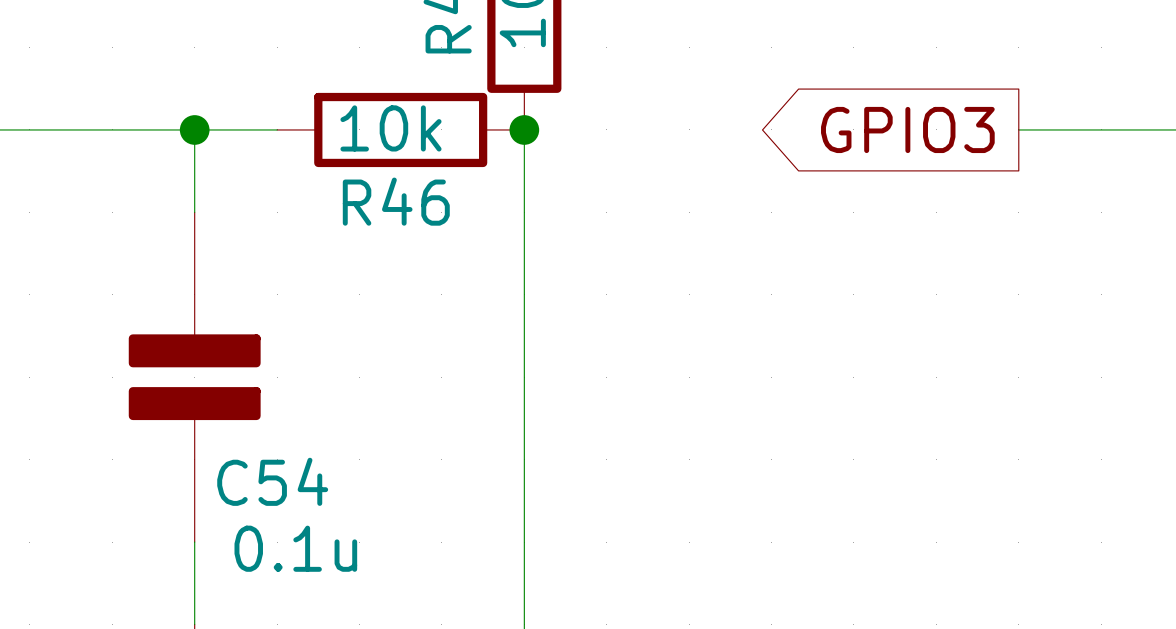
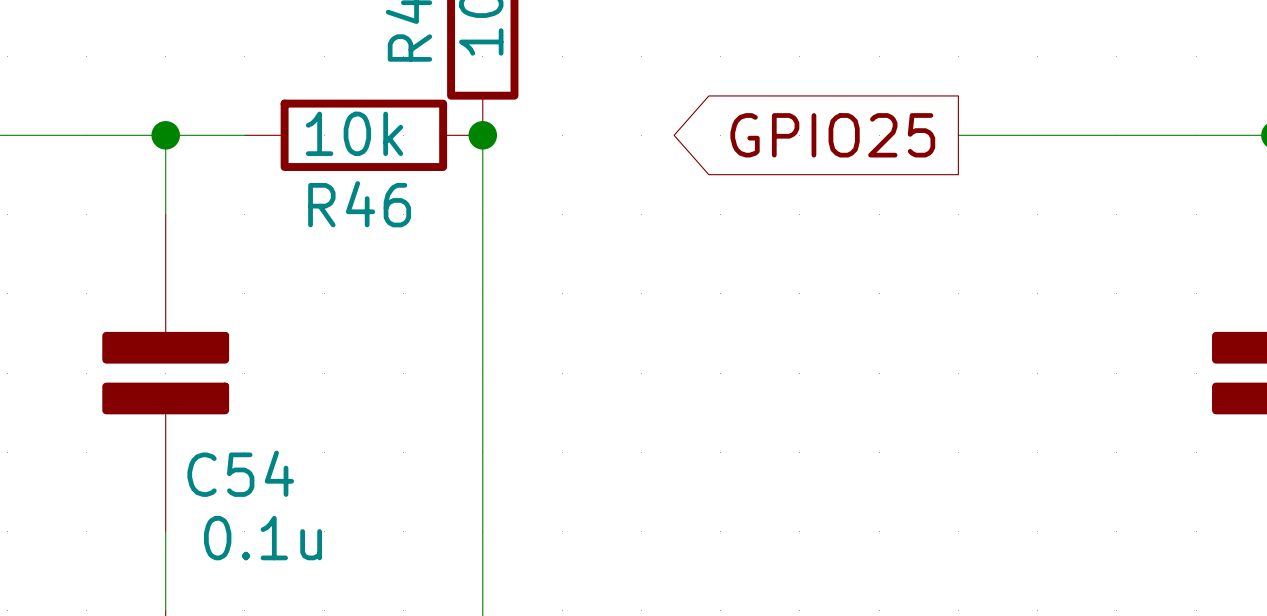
global label: GPIO3 (907, 129) -> GPIO25 (832, 135)

